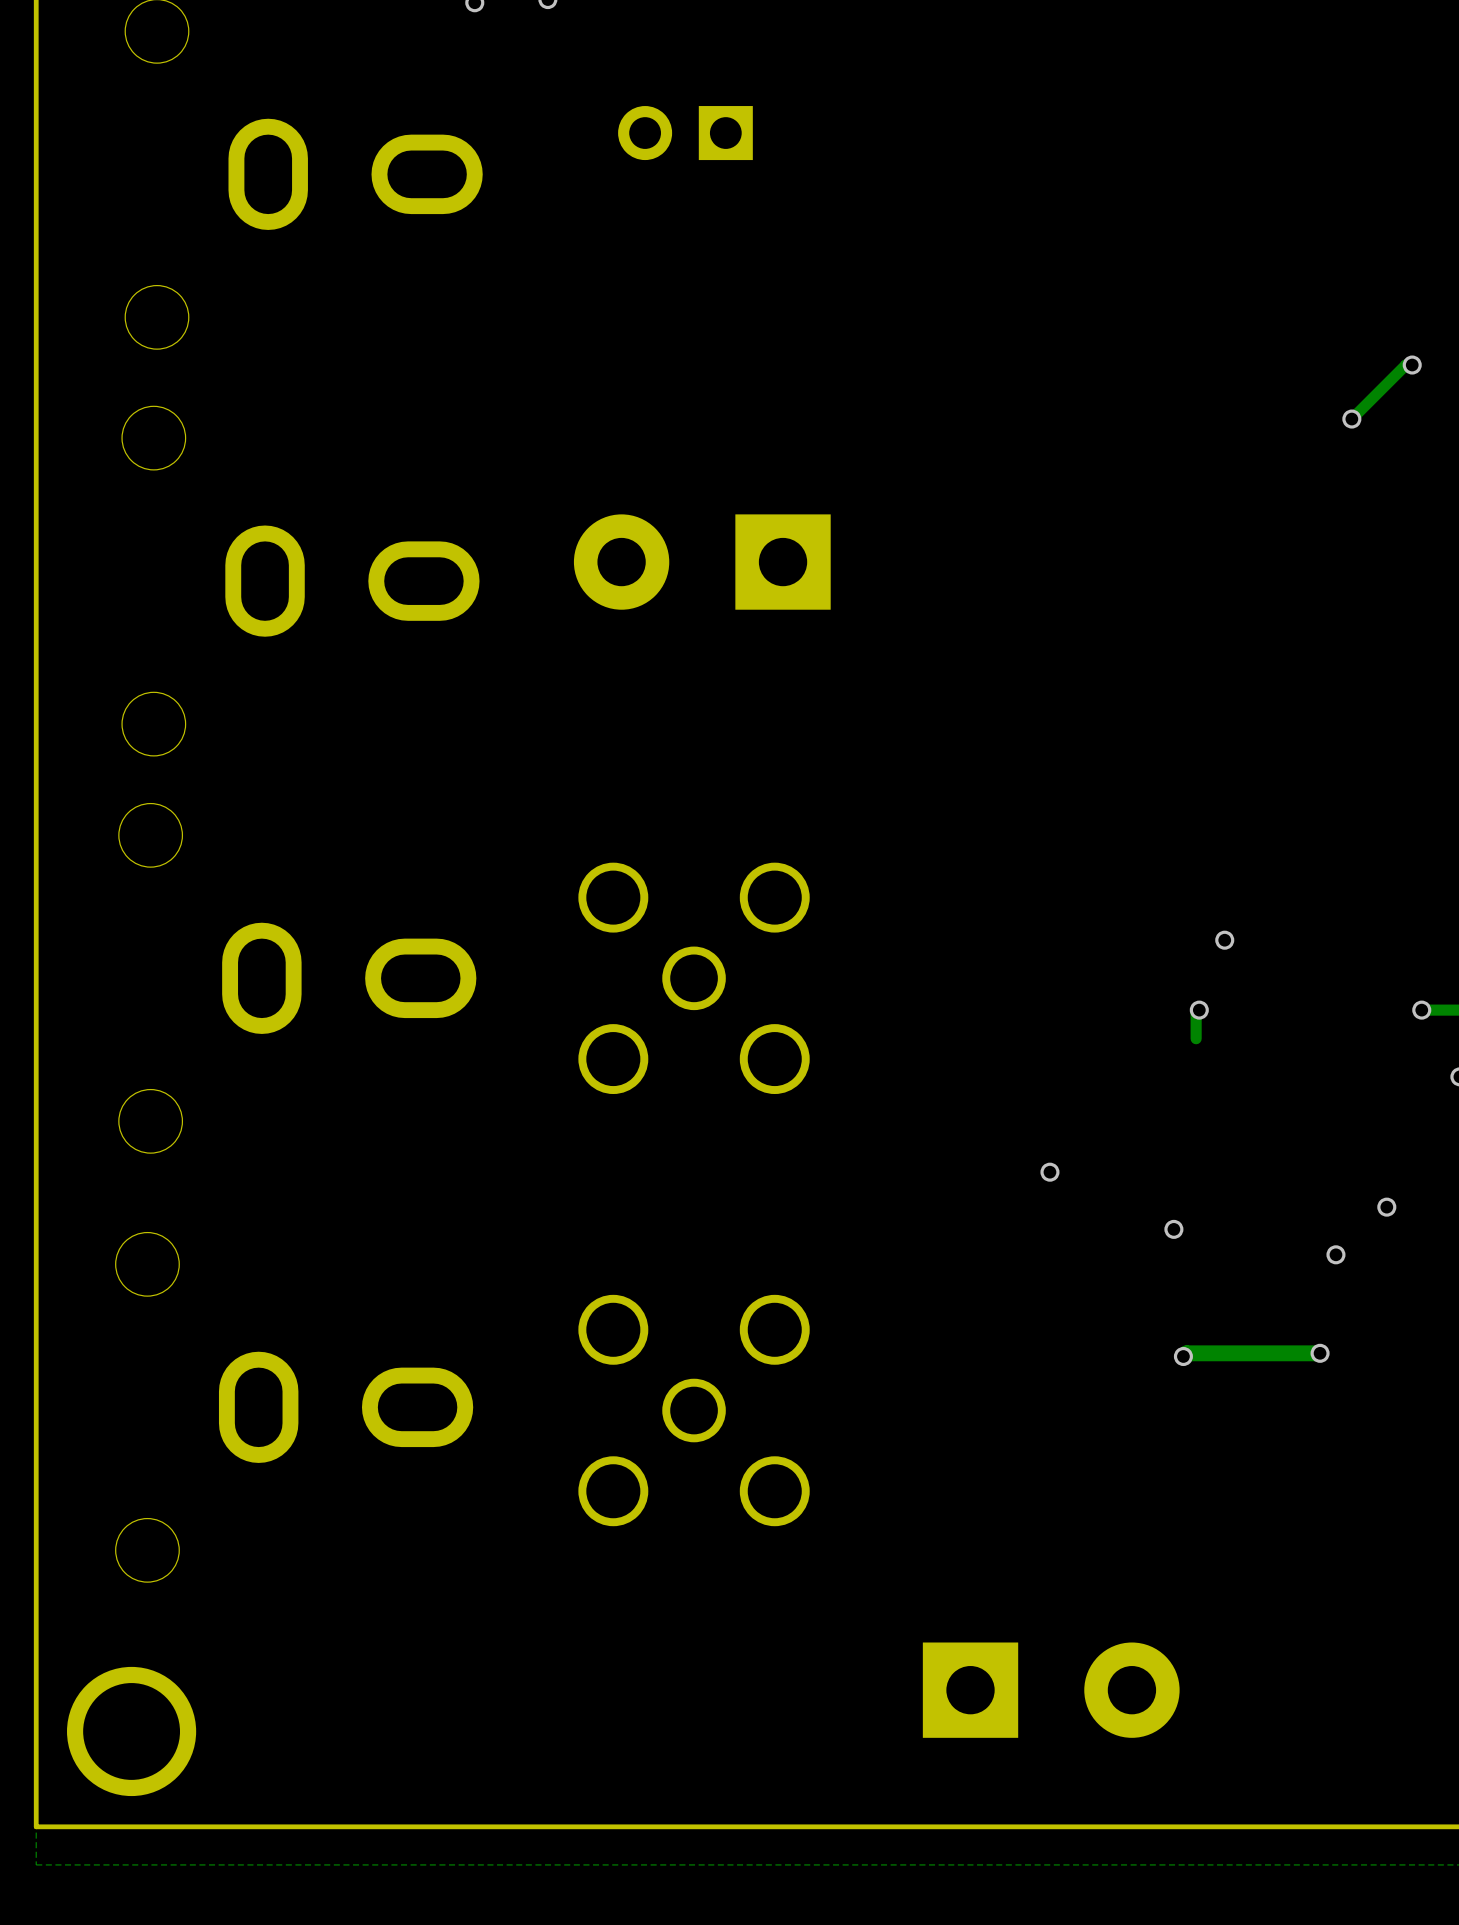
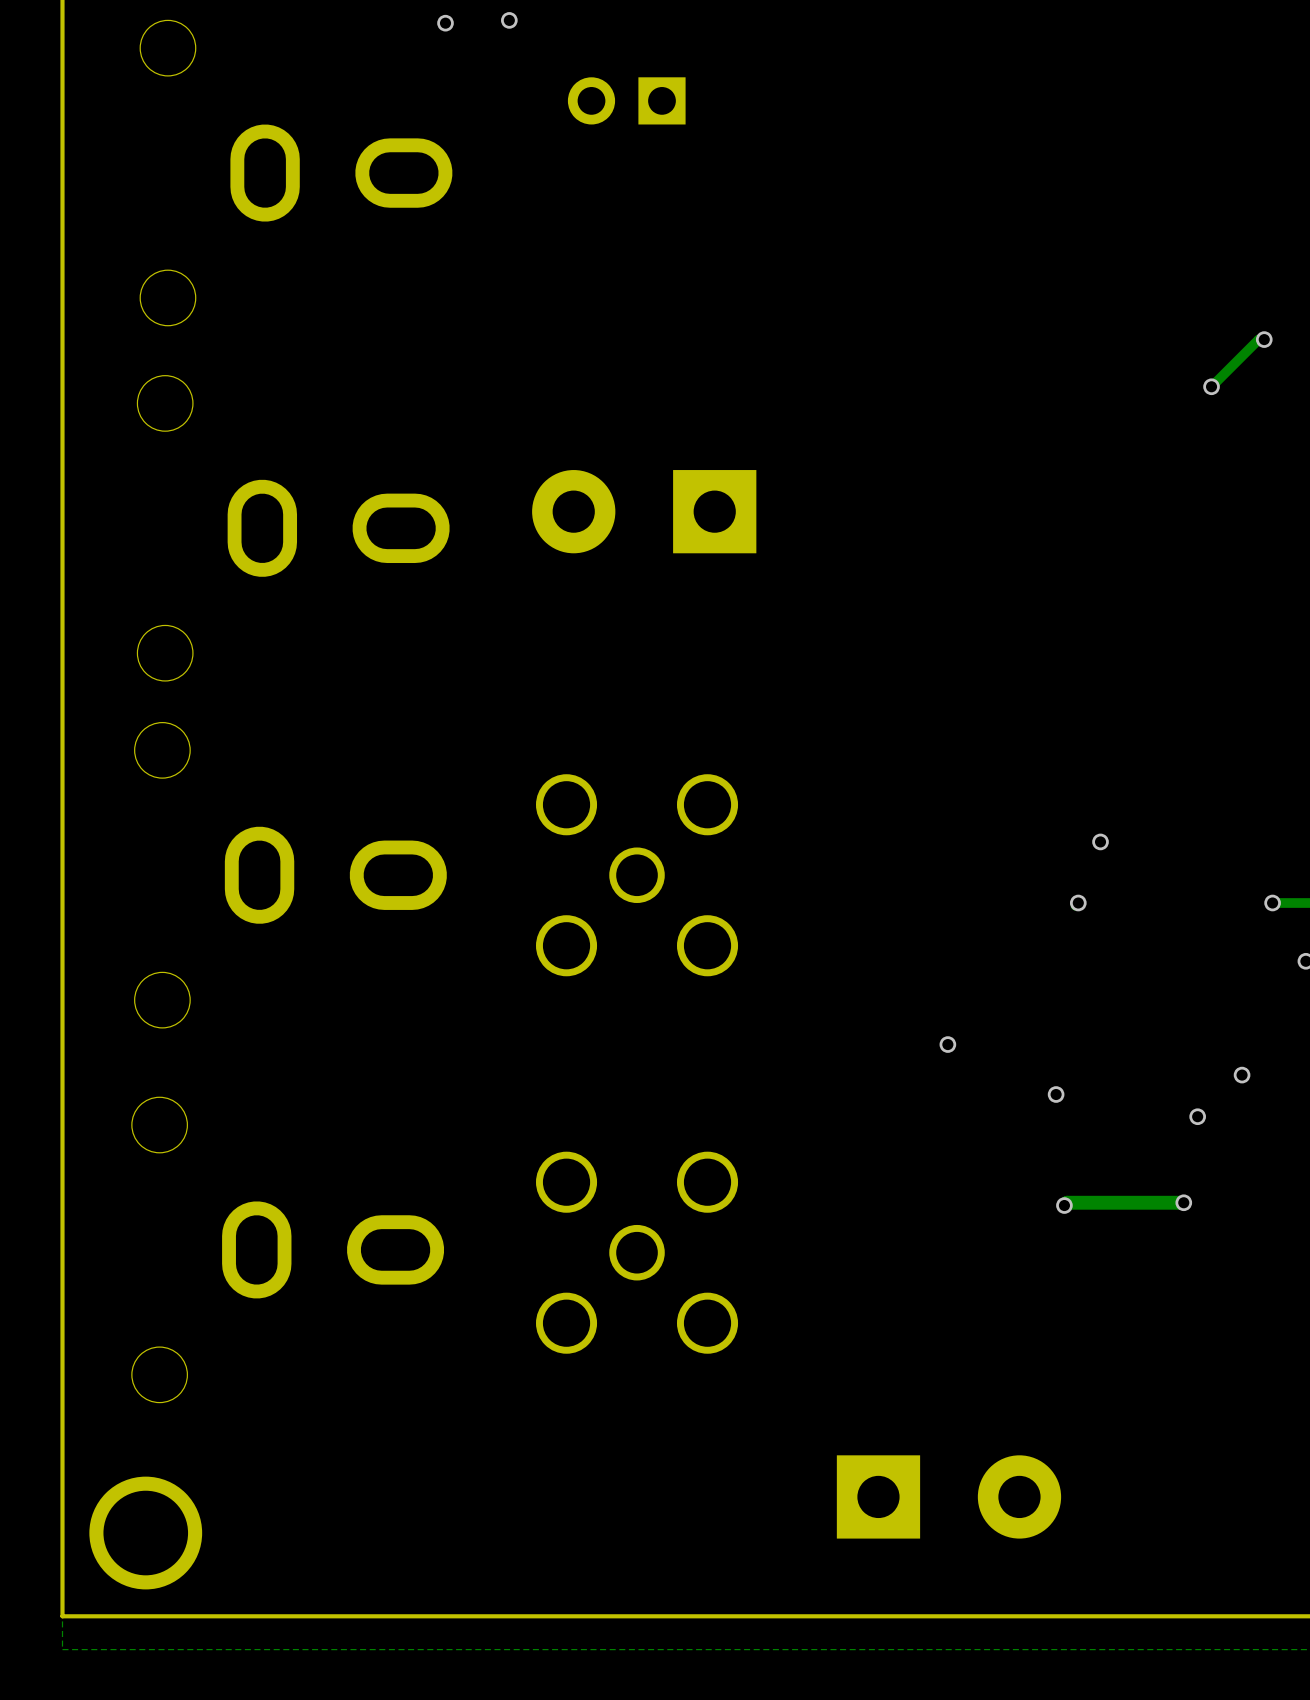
part position: (685, 133) -> (626, 100)
track: (1196, 1013) (1196, 1038) -> none

